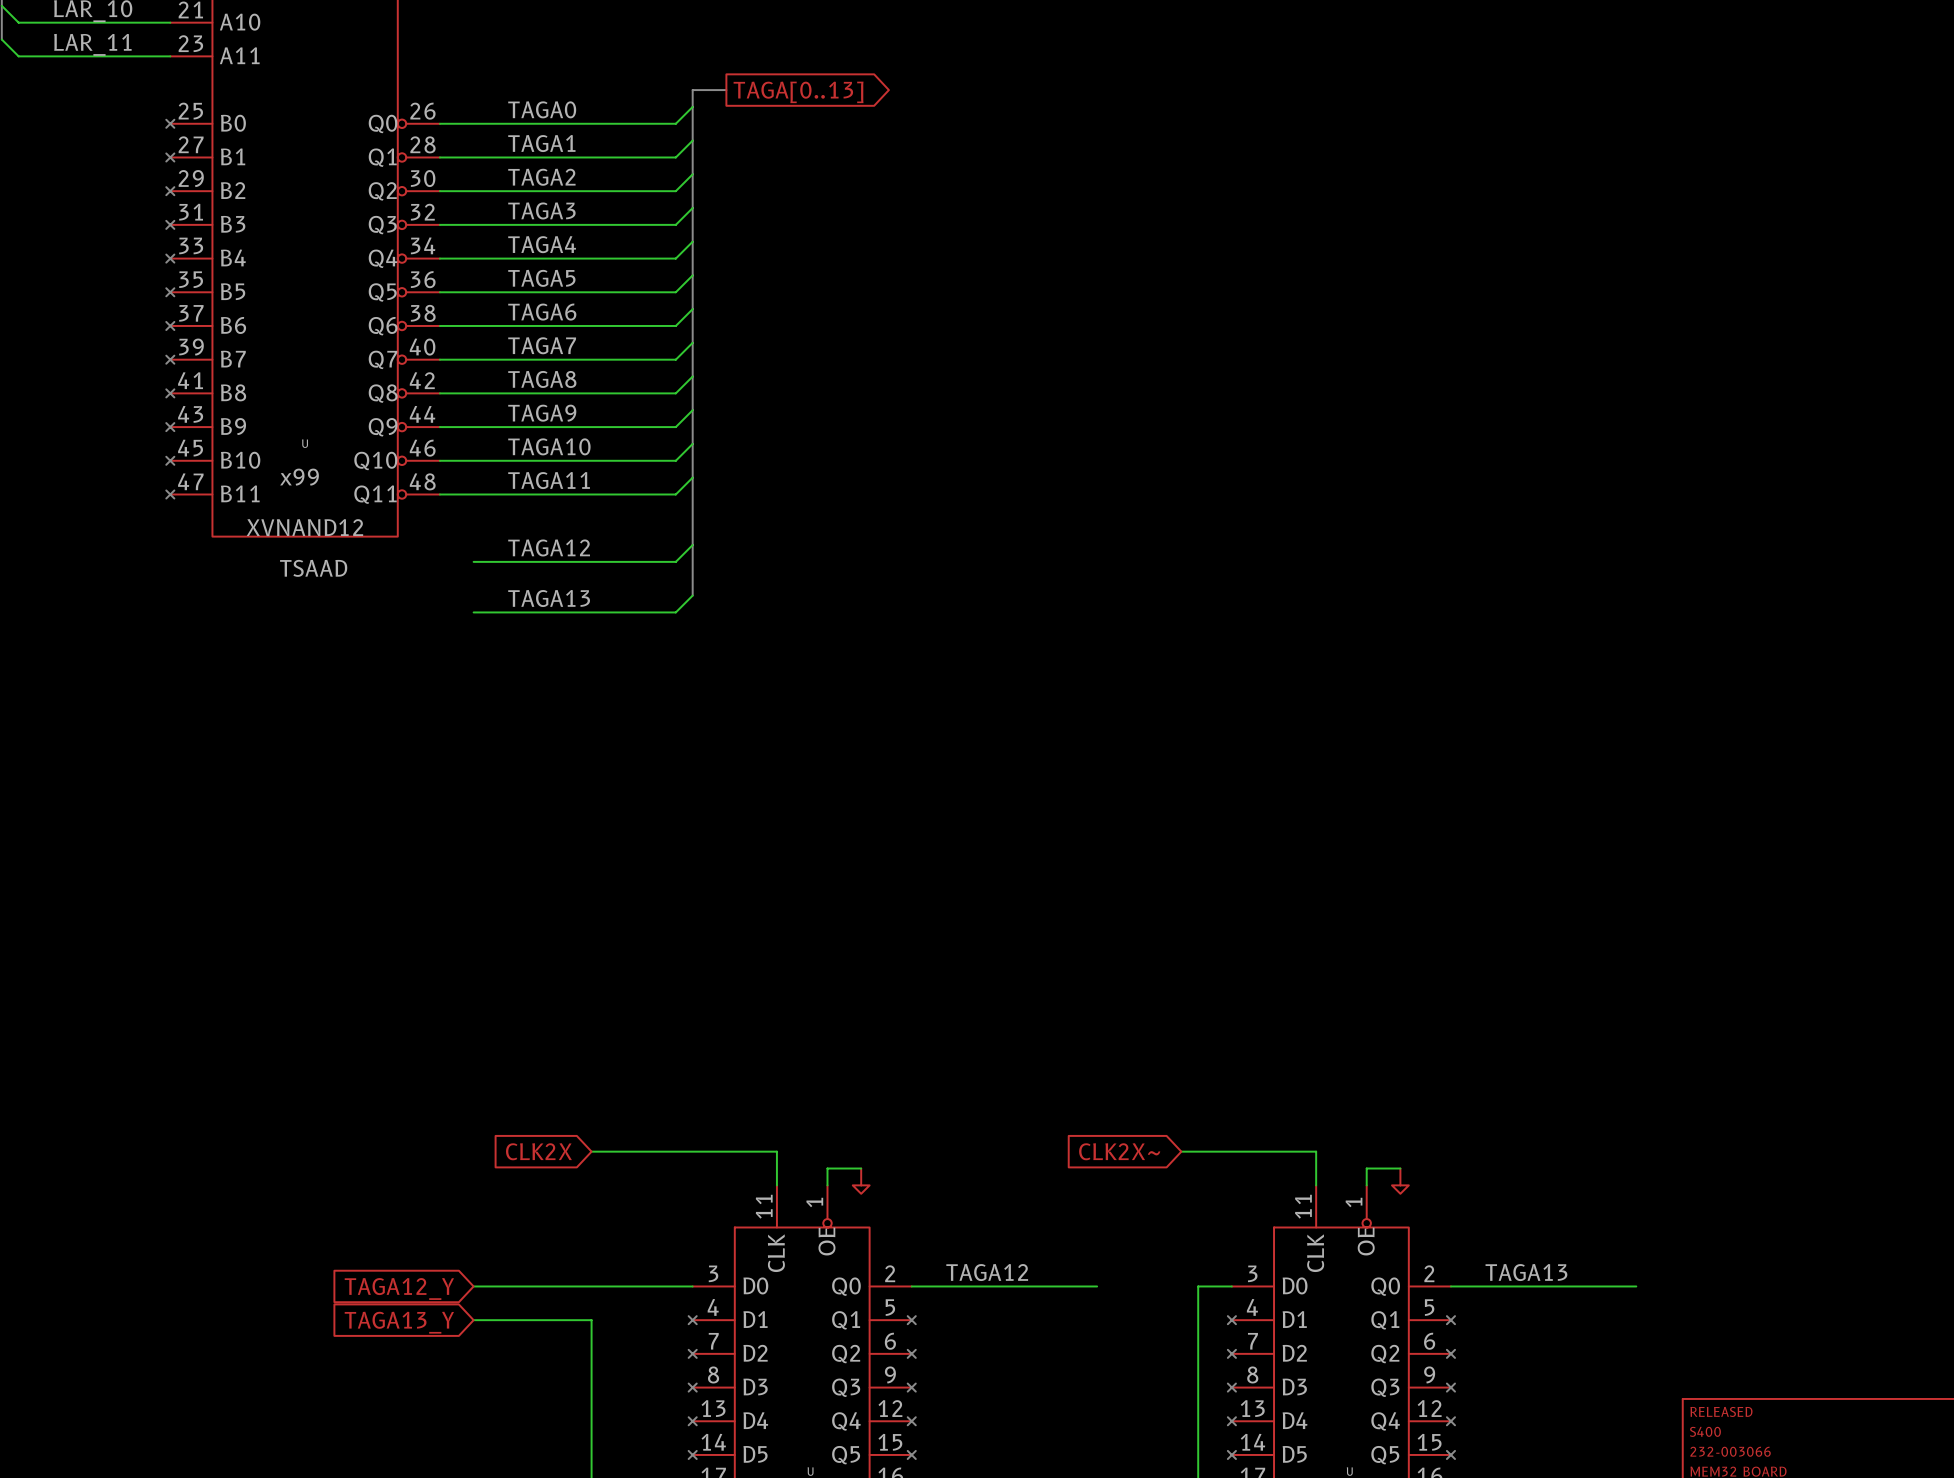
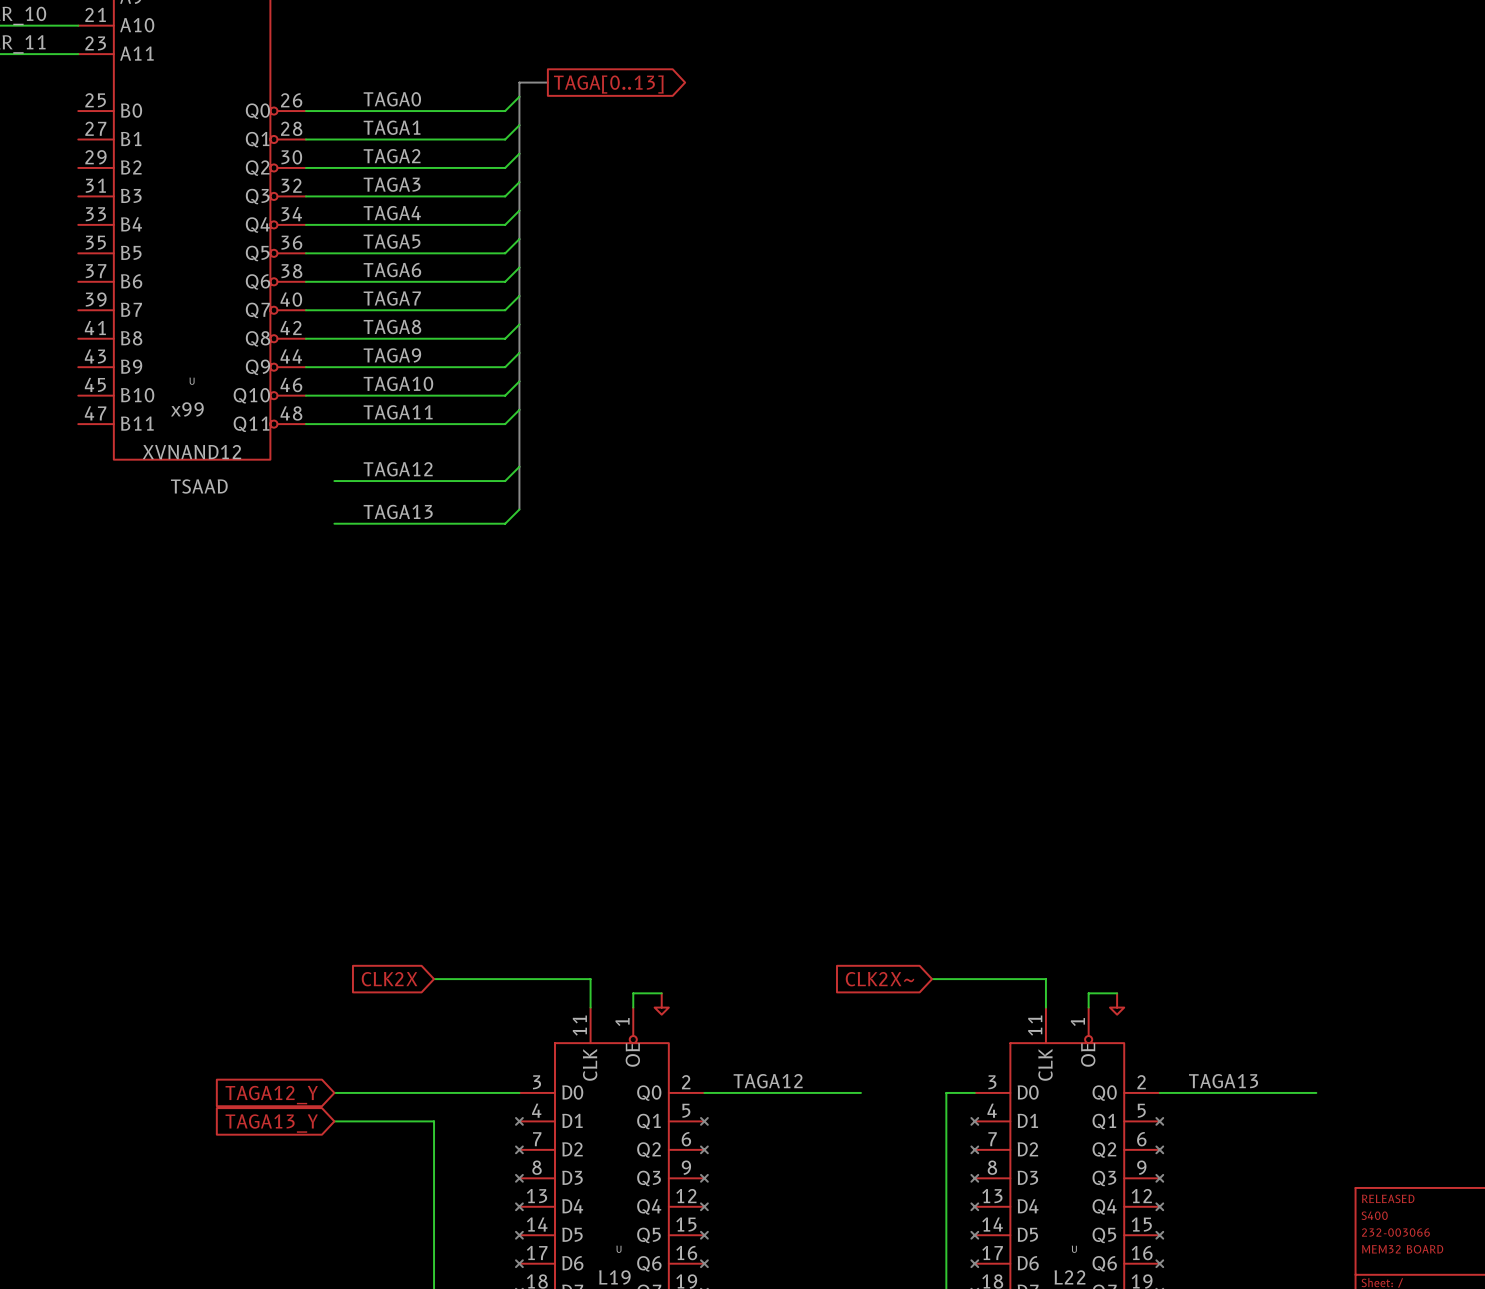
no-connect mark: (170, 123) -> none
no-connect mark: (170, 157) -> none
no-connect mark: (170, 191) -> none
no-connect mark: (170, 224) -> none
no-connect mark: (170, 258) -> none
no-connect mark: (170, 292) -> none
no-connect mark: (170, 325) -> none
no-connect mark: (170, 359) -> none
no-connect mark: (170, 393) -> none
no-connect mark: (170, 427) -> none
no-connect mark: (170, 460) -> none
no-connect mark: (170, 494) -> none

